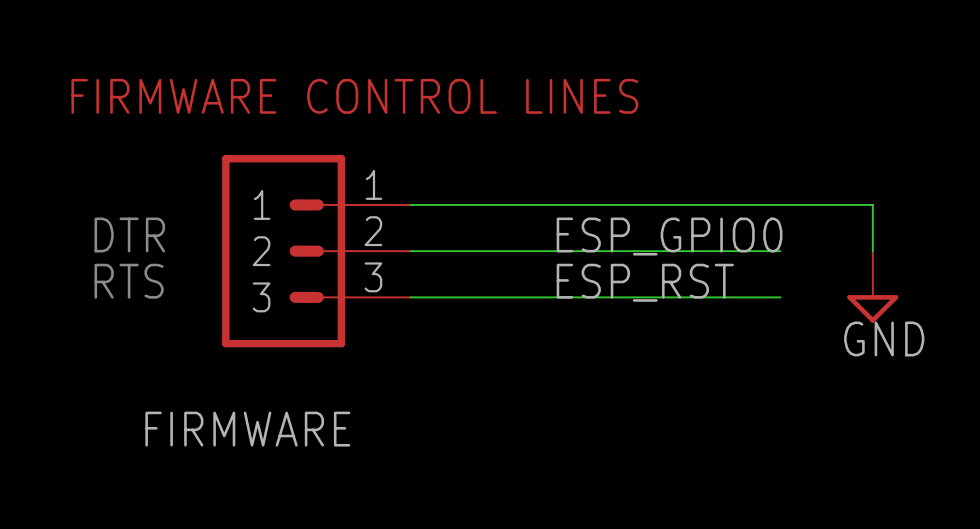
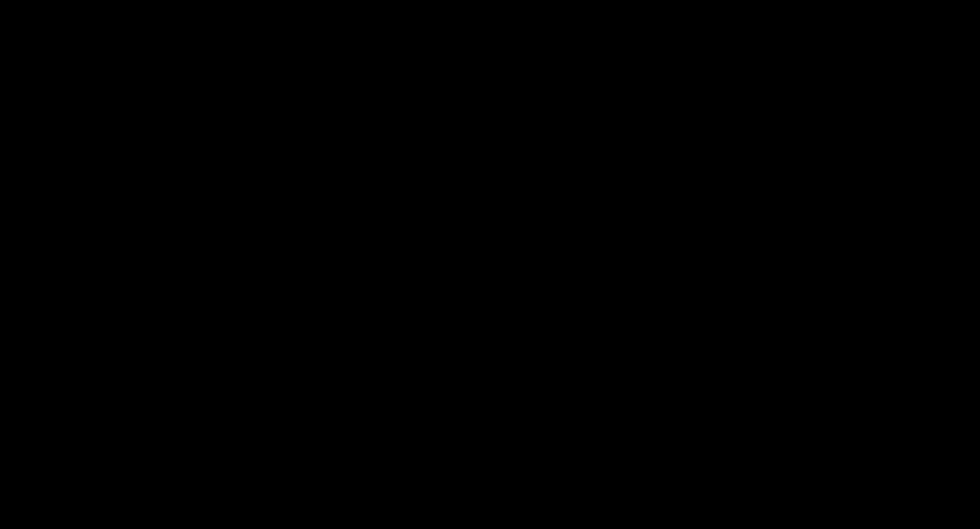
text: FIRMWARE CONTROL LINES (354, 96) -> none
wire: (410, 204) (872, 204) (872, 251) -> none
text: DTR (129, 234) -> none
label: ESP_GPIO0 (669, 236) -> none
FIRMWARE: (316, 251) -> none
wire: (410, 251) (780, 251) -> none
text: RTS (129, 281) -> none
label: ESP_RST (645, 282) -> none
power symbol: GND (872, 286) -> none
wire: (410, 297) (780, 297) -> none

